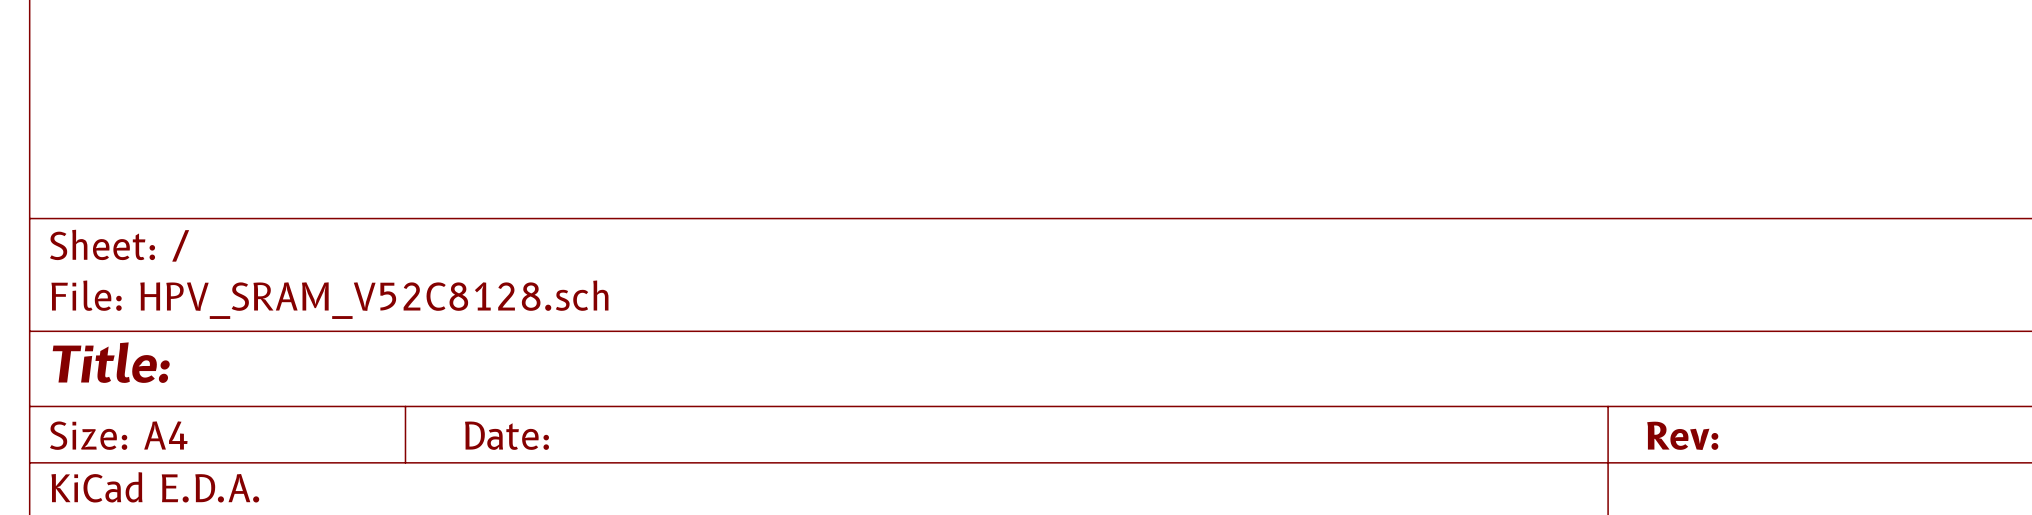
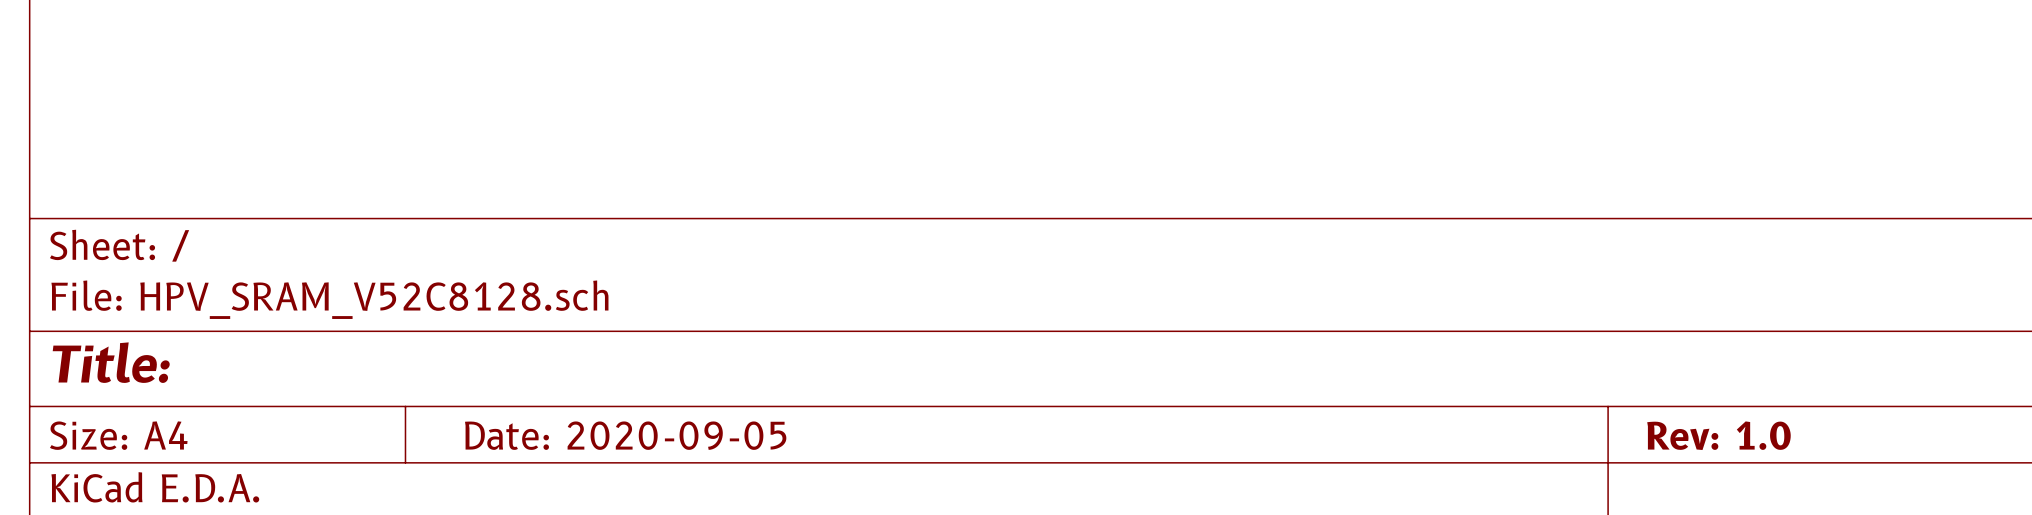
title block: Date: (506, 435) -> Date: 2020-09-05 (625, 435)
title block: Rev: (1682, 435) -> Rev: 1.0 (1718, 435)

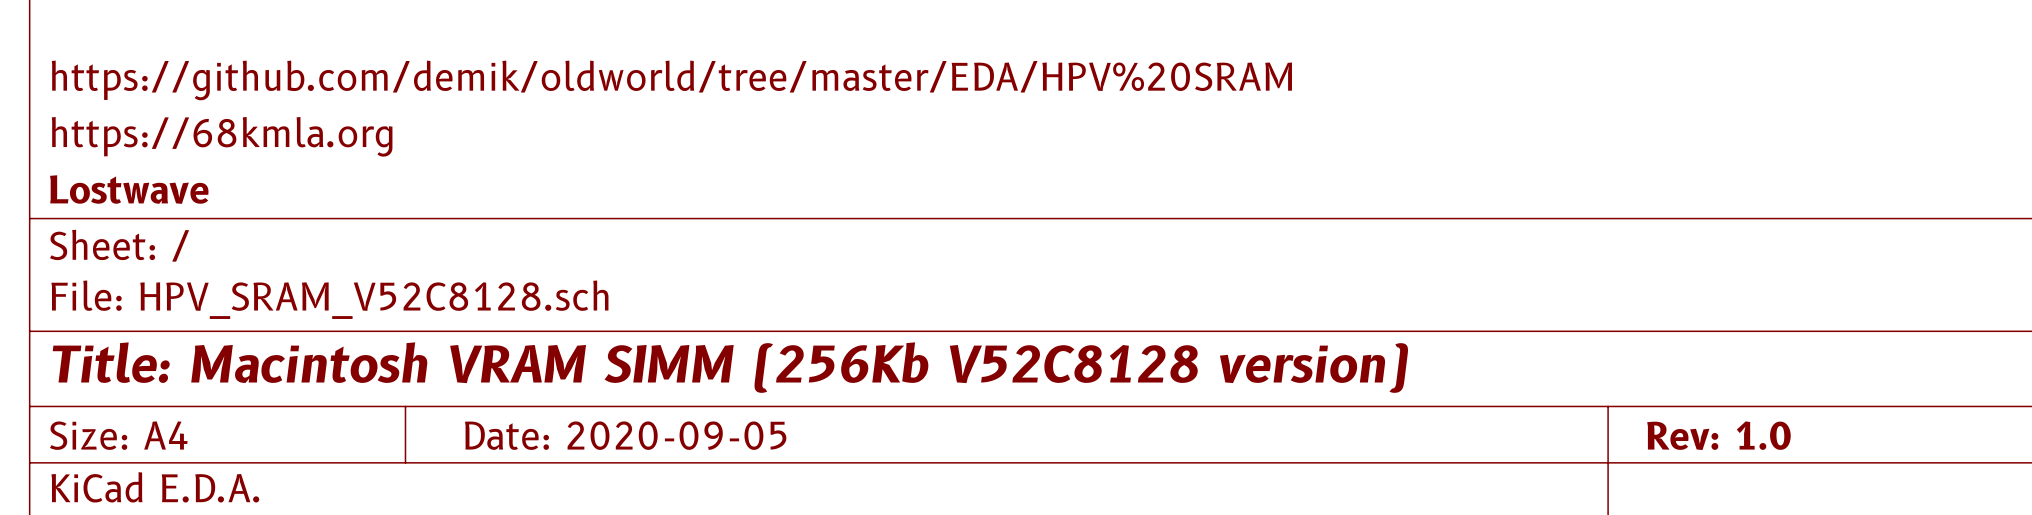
title block: none -> https://github.com/demik/oldworld/tree/master/EDA/HPV%20SRAM (671, 80)
title block: none -> https://68kmla.org (222, 136)
title block: none -> Lostwave (129, 189)
title block: Title: (111, 362) -> Title: Macintosh VRAM SIMM (256Kb V52C8128 version) (730, 367)

